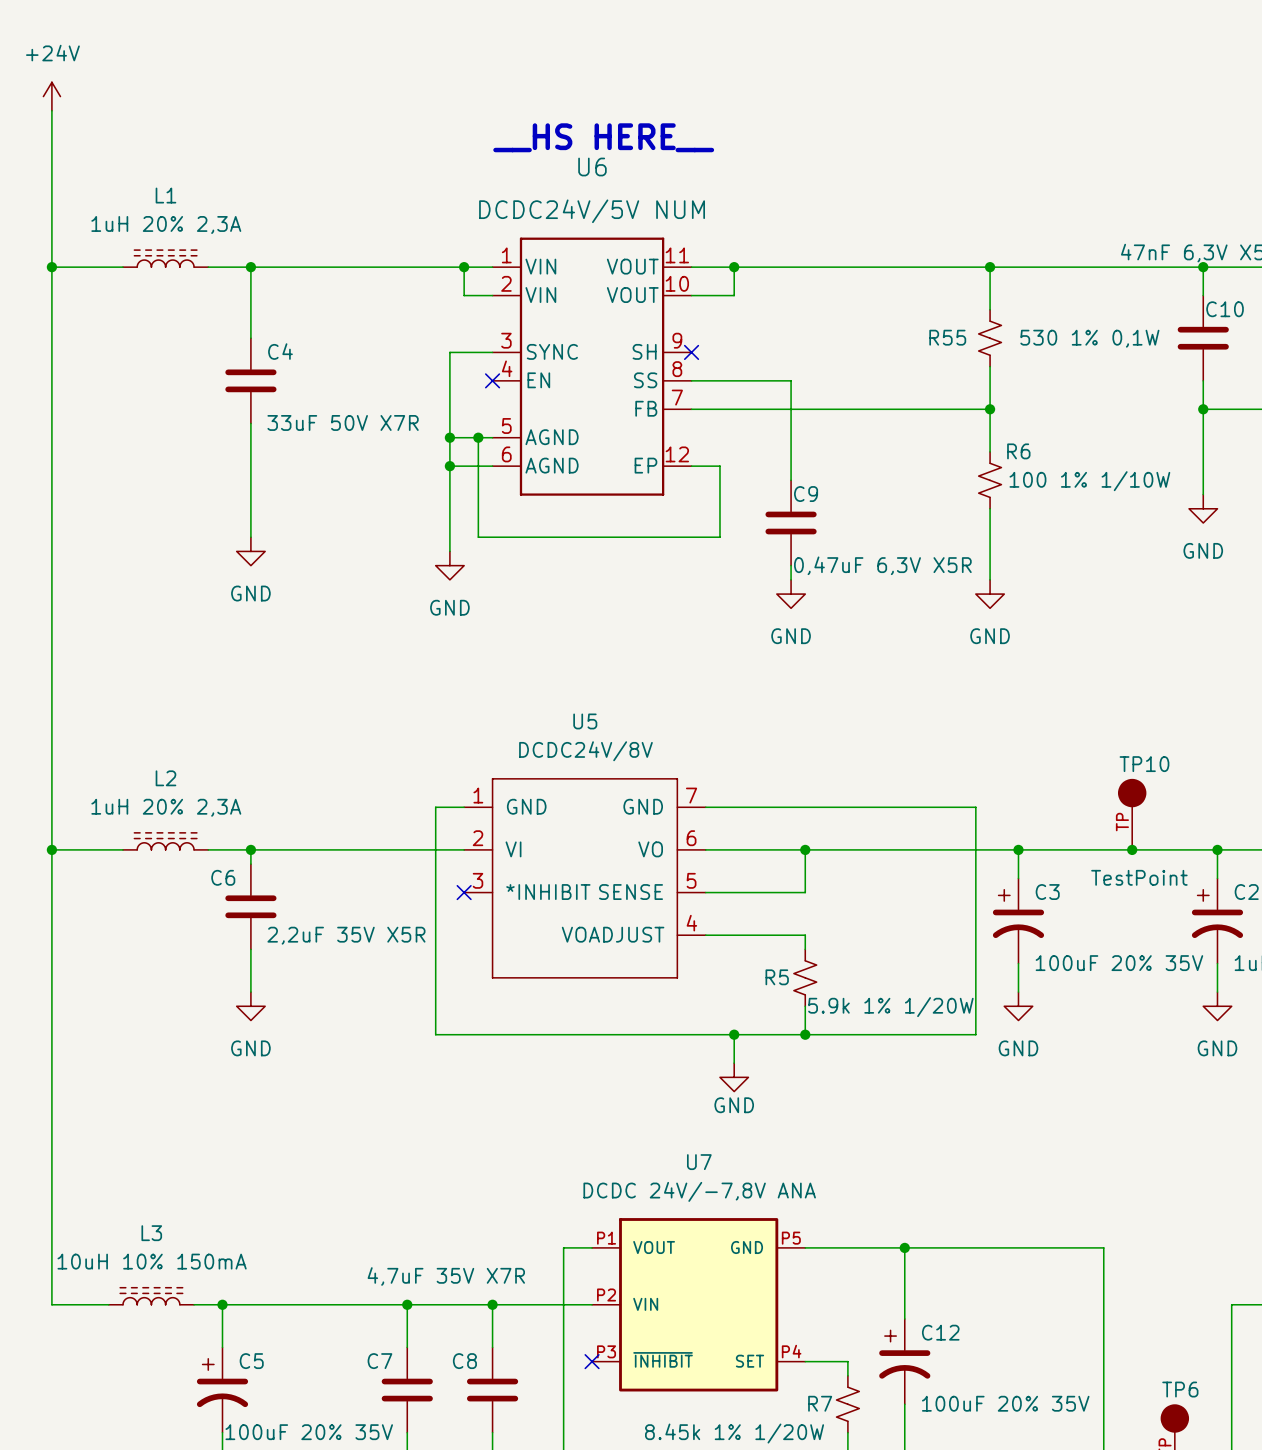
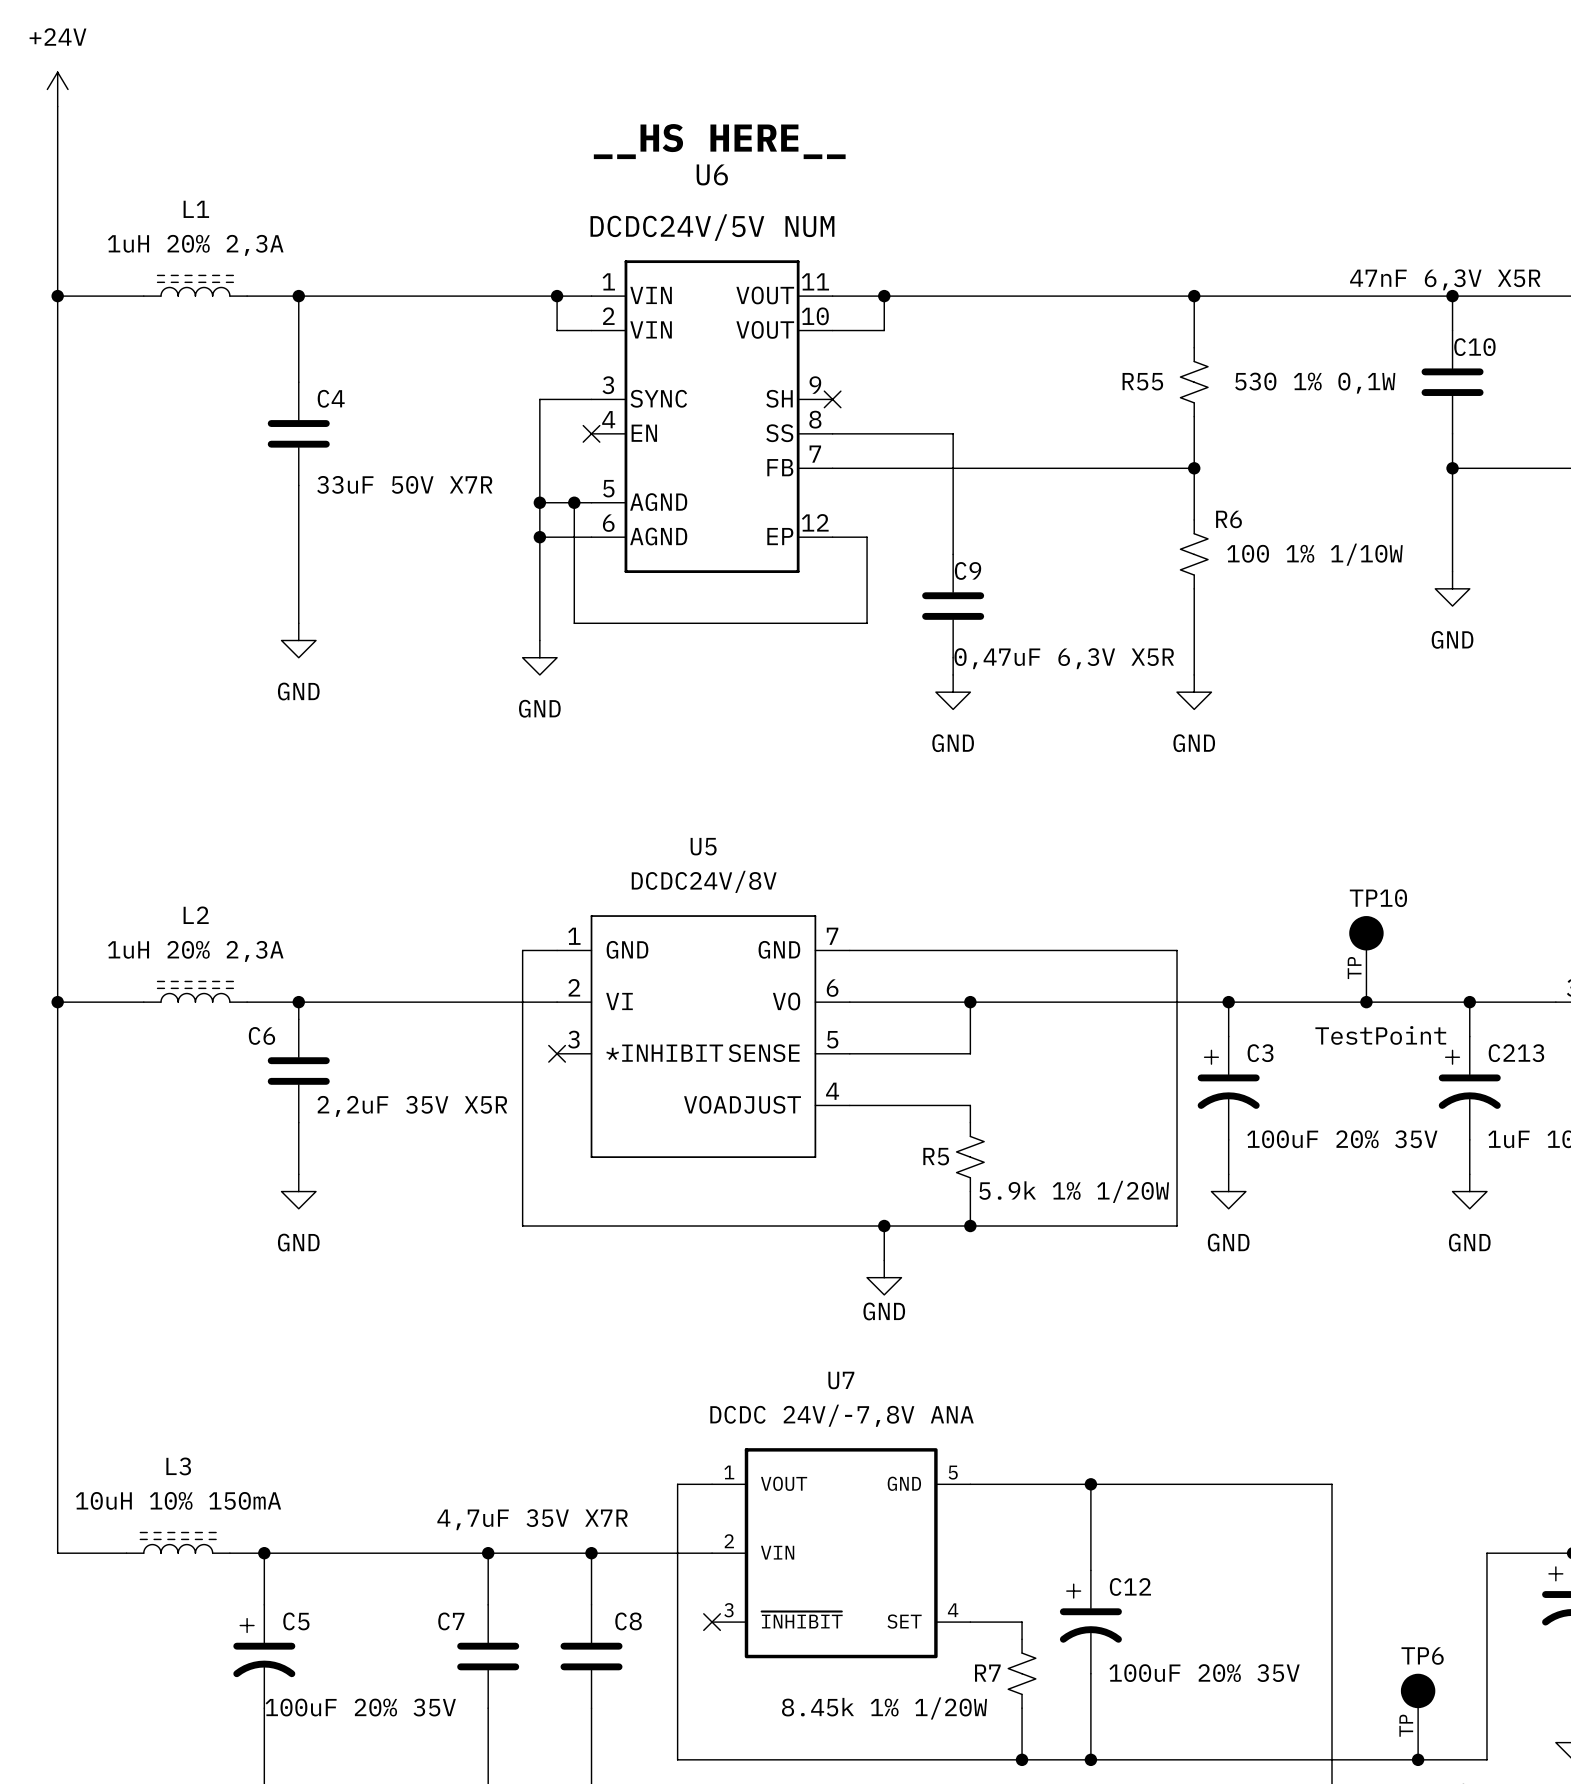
U7 pin number: P1 (606, 1238) -> 1 (729, 1472)
U7 pin number: P5 (791, 1238) -> 5 (953, 1472)
U7 pin number: P2 (606, 1295) -> 2 (729, 1541)
U7 pin number: P3 (606, 1351) -> 3 (728, 1610)
U7 pin number: P4 (791, 1351) -> 4 (953, 1610)
C8 name position: C8 (464, 1361) -> C8 (628, 1621)

